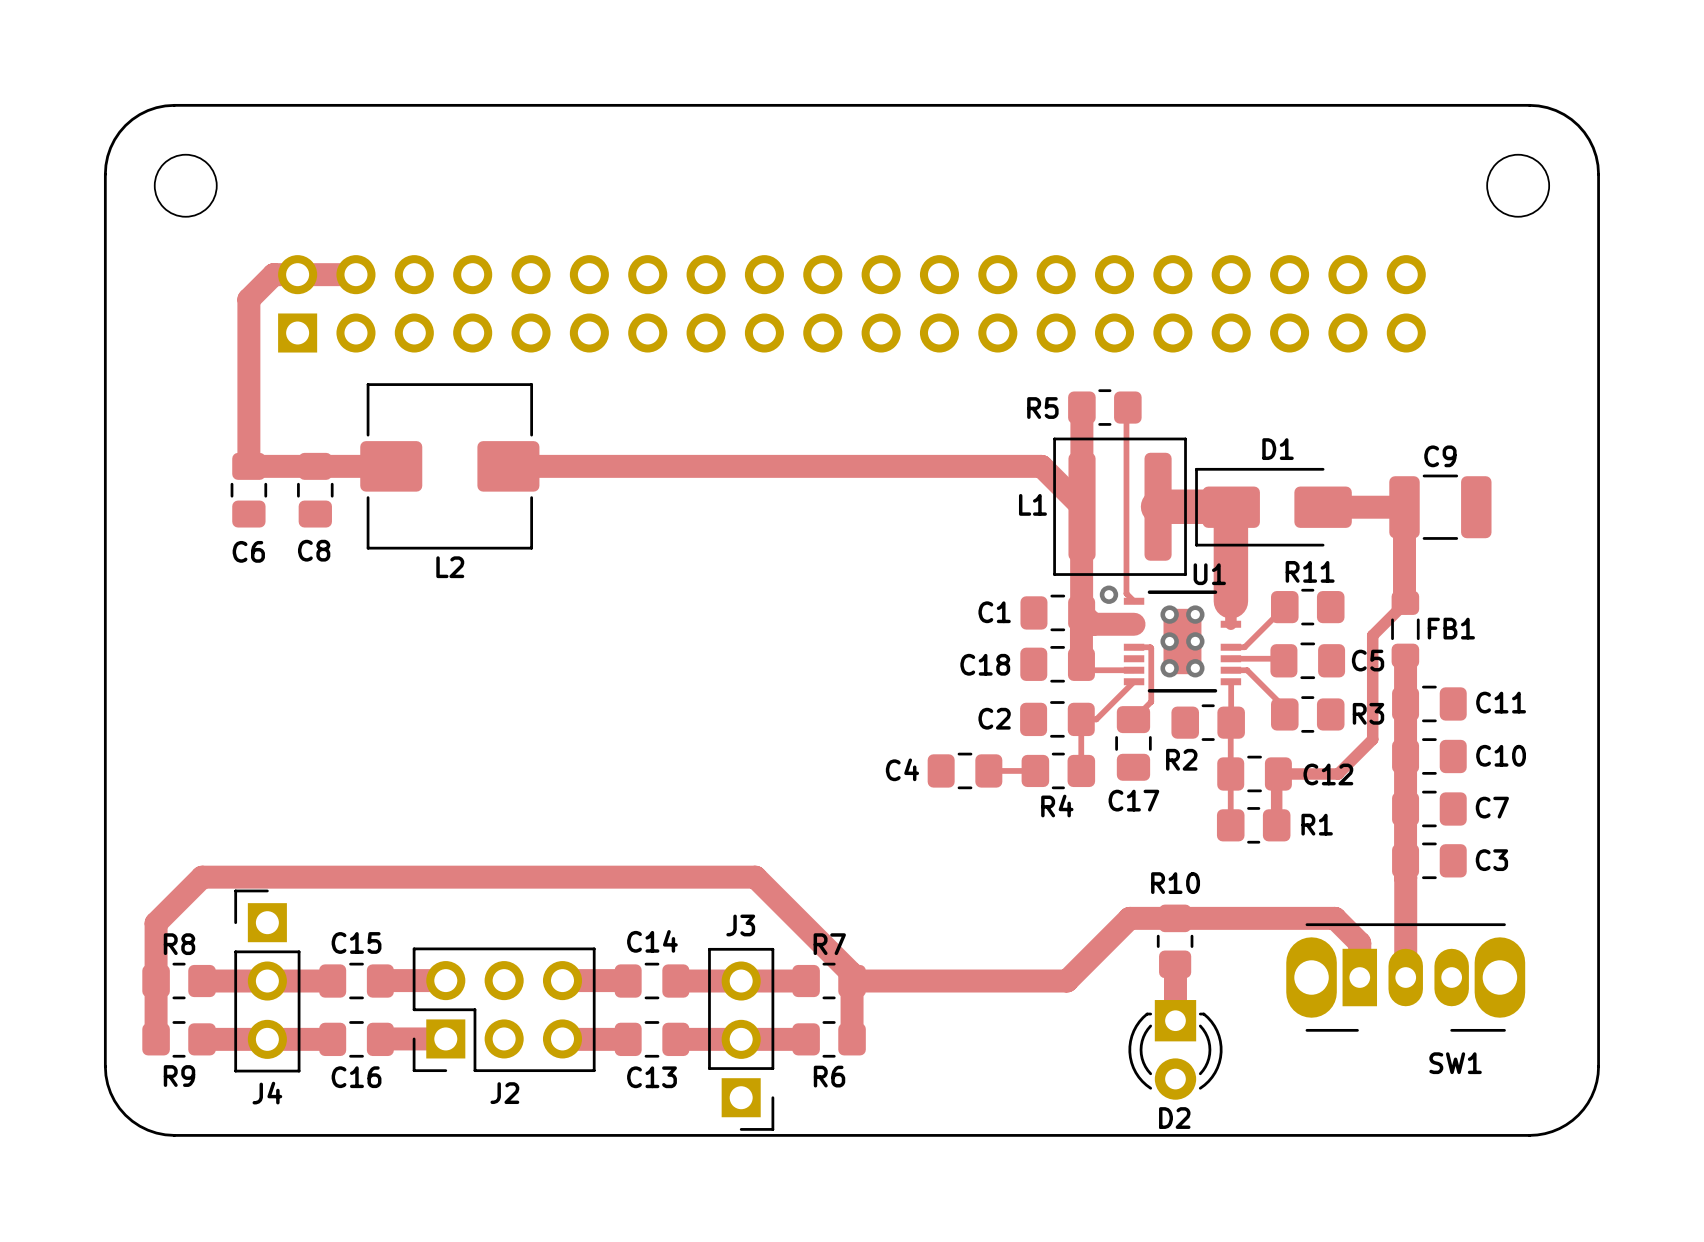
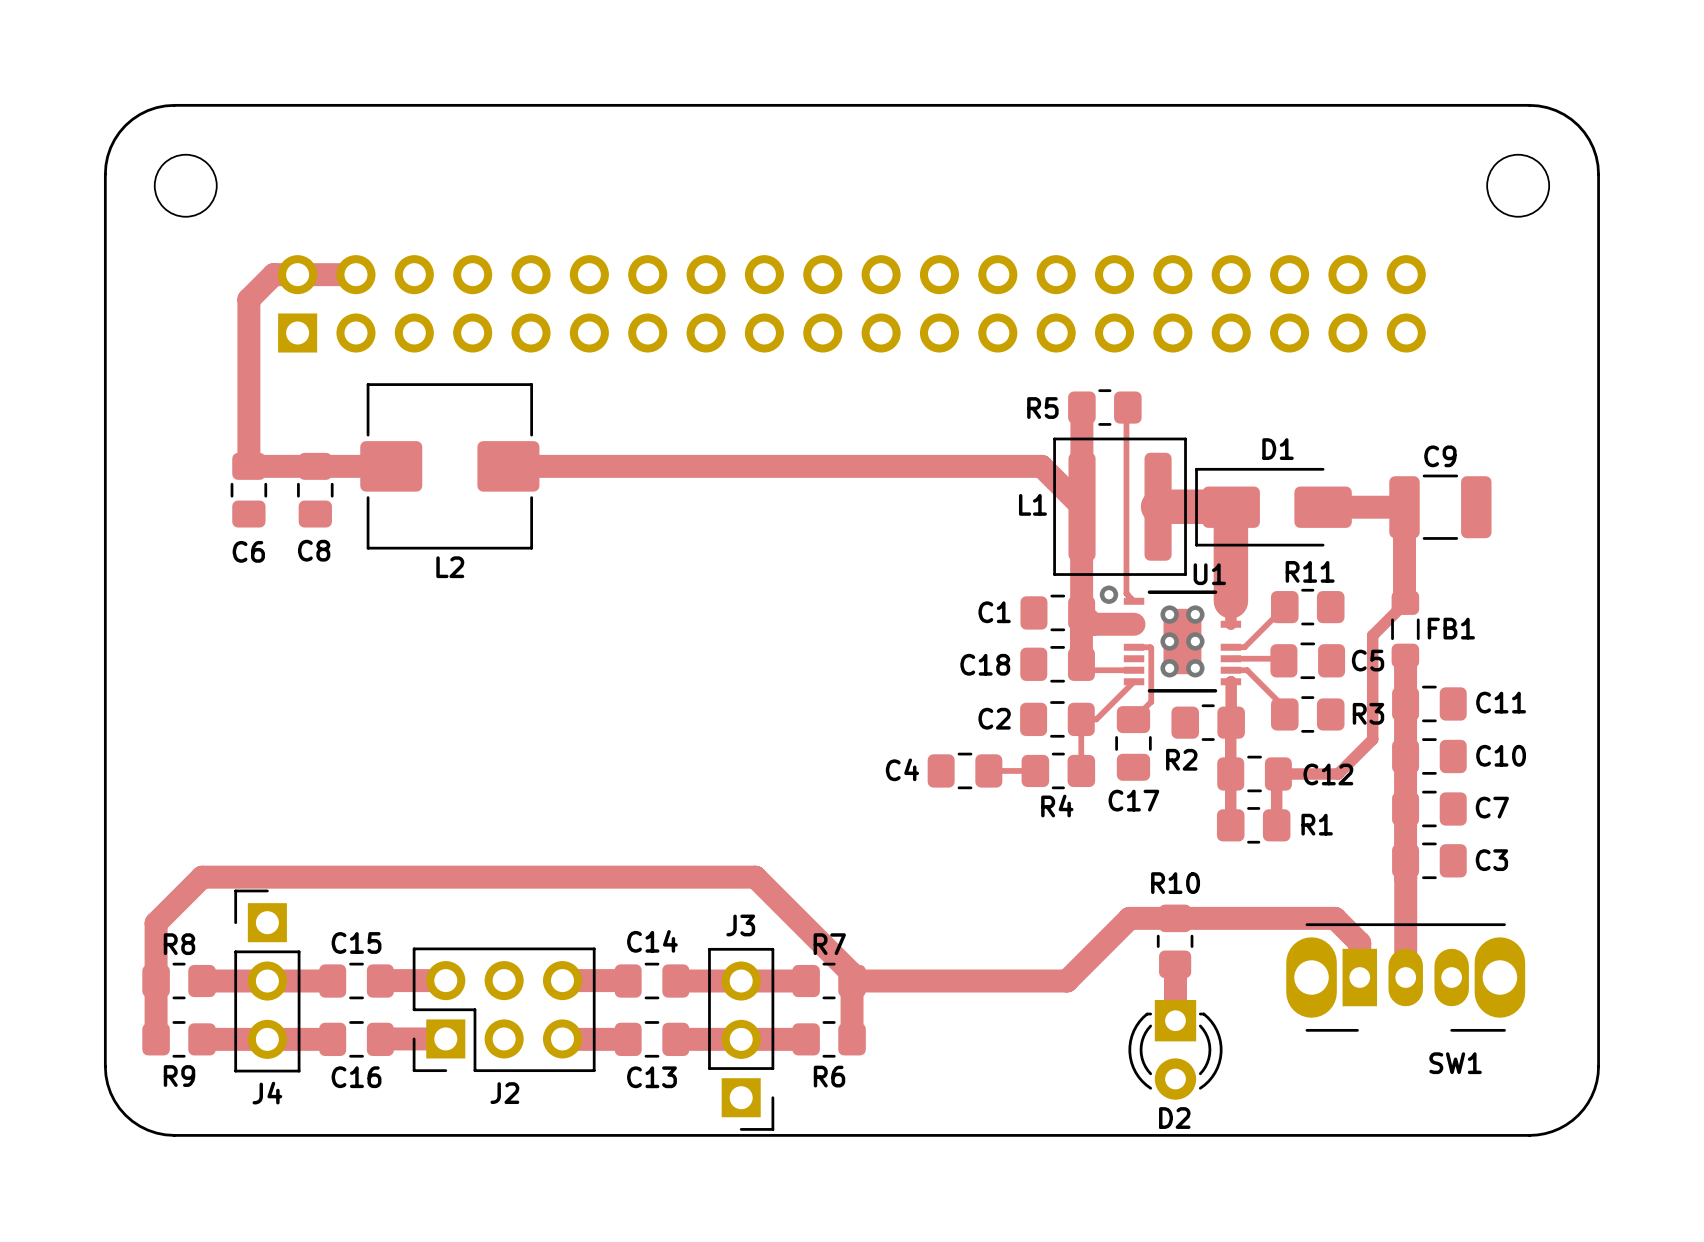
track width: thin (1231, 681) (1230, 825) -> thick (1231, 681) (1230, 825)

